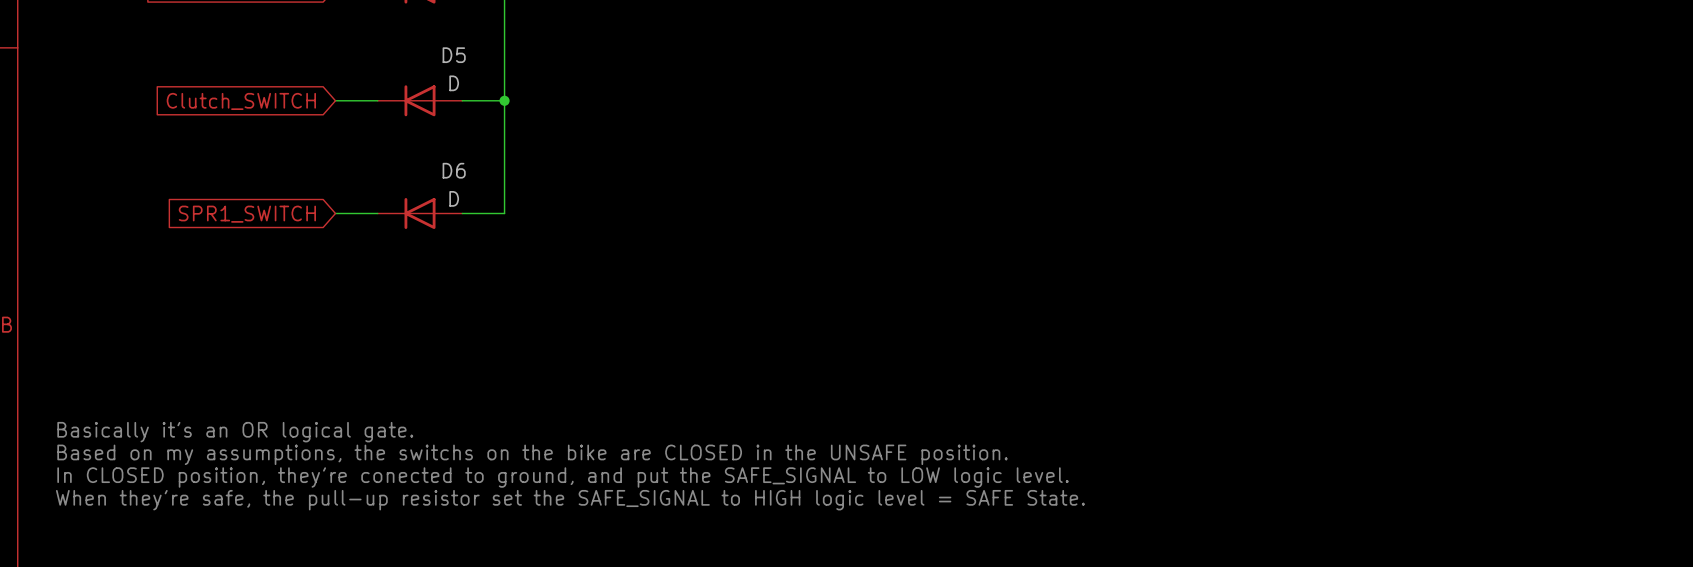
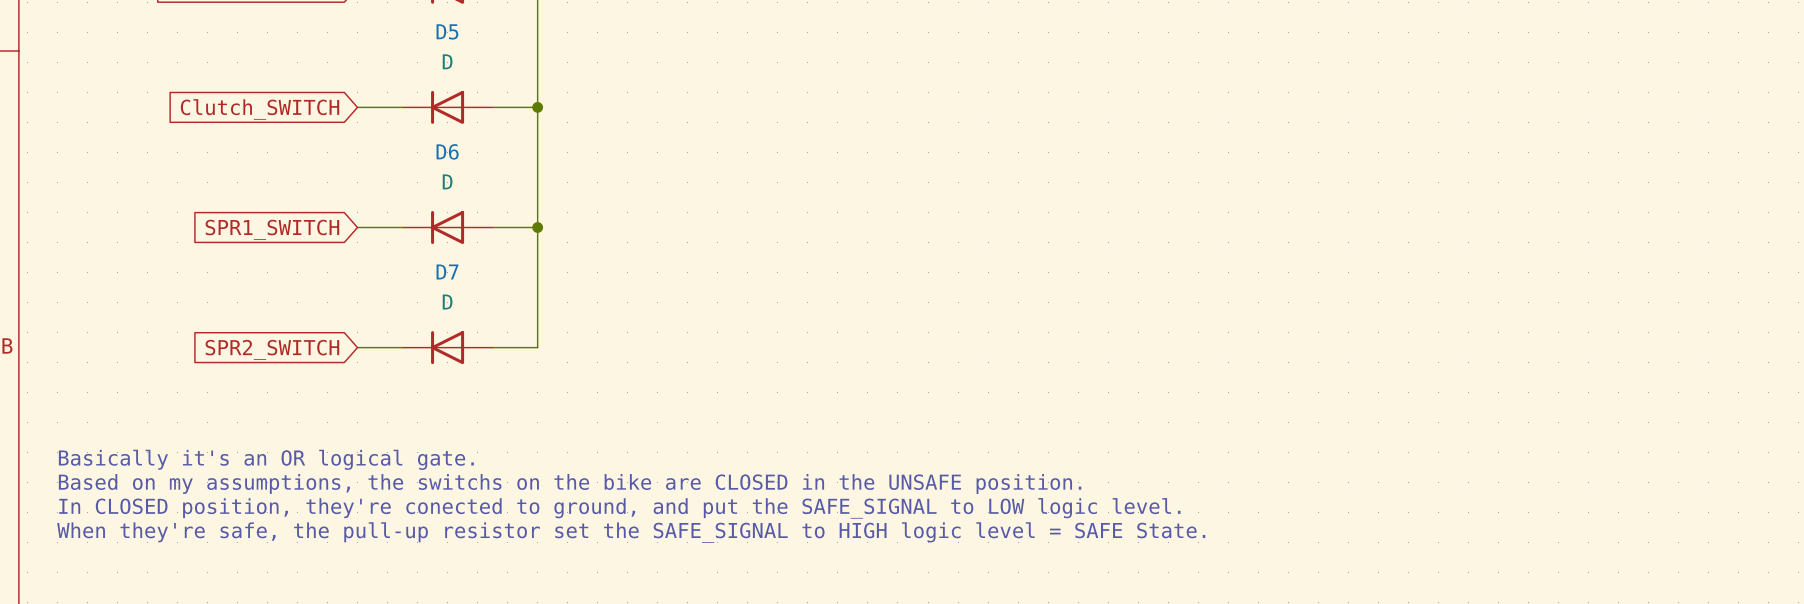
D5 name position: D5 (454, 55) -> D5 (447, 31)
D5 value position: D (454, 83) -> D (447, 61)
D6 name position: D6 (454, 170) -> D6 (447, 151)
D6 value position: D (454, 198) -> D (447, 181)
wire: none -> (537, 227) (537, 347) (492, 347)
junction: none -> (537, 227)
global label: none -> SPR2_SWITCH (272, 349)
wire: none -> (357, 347) (402, 347)
D7: none -> D (447, 347)

